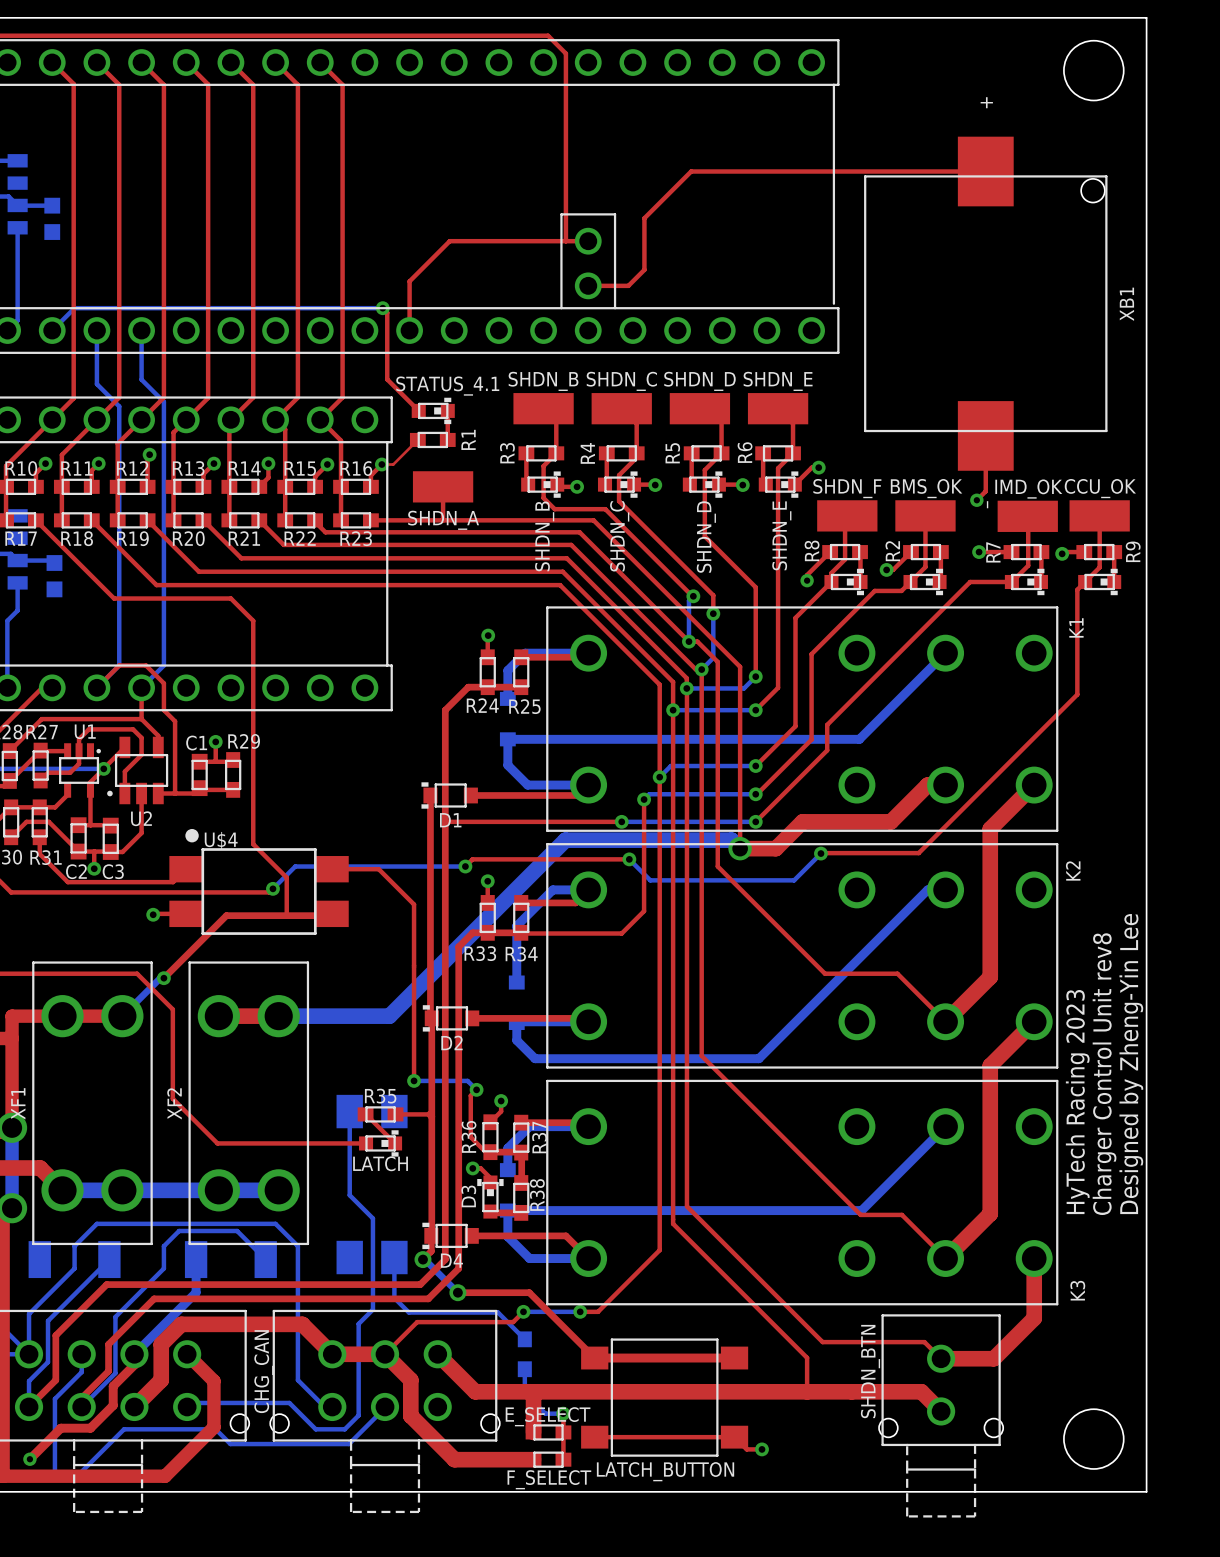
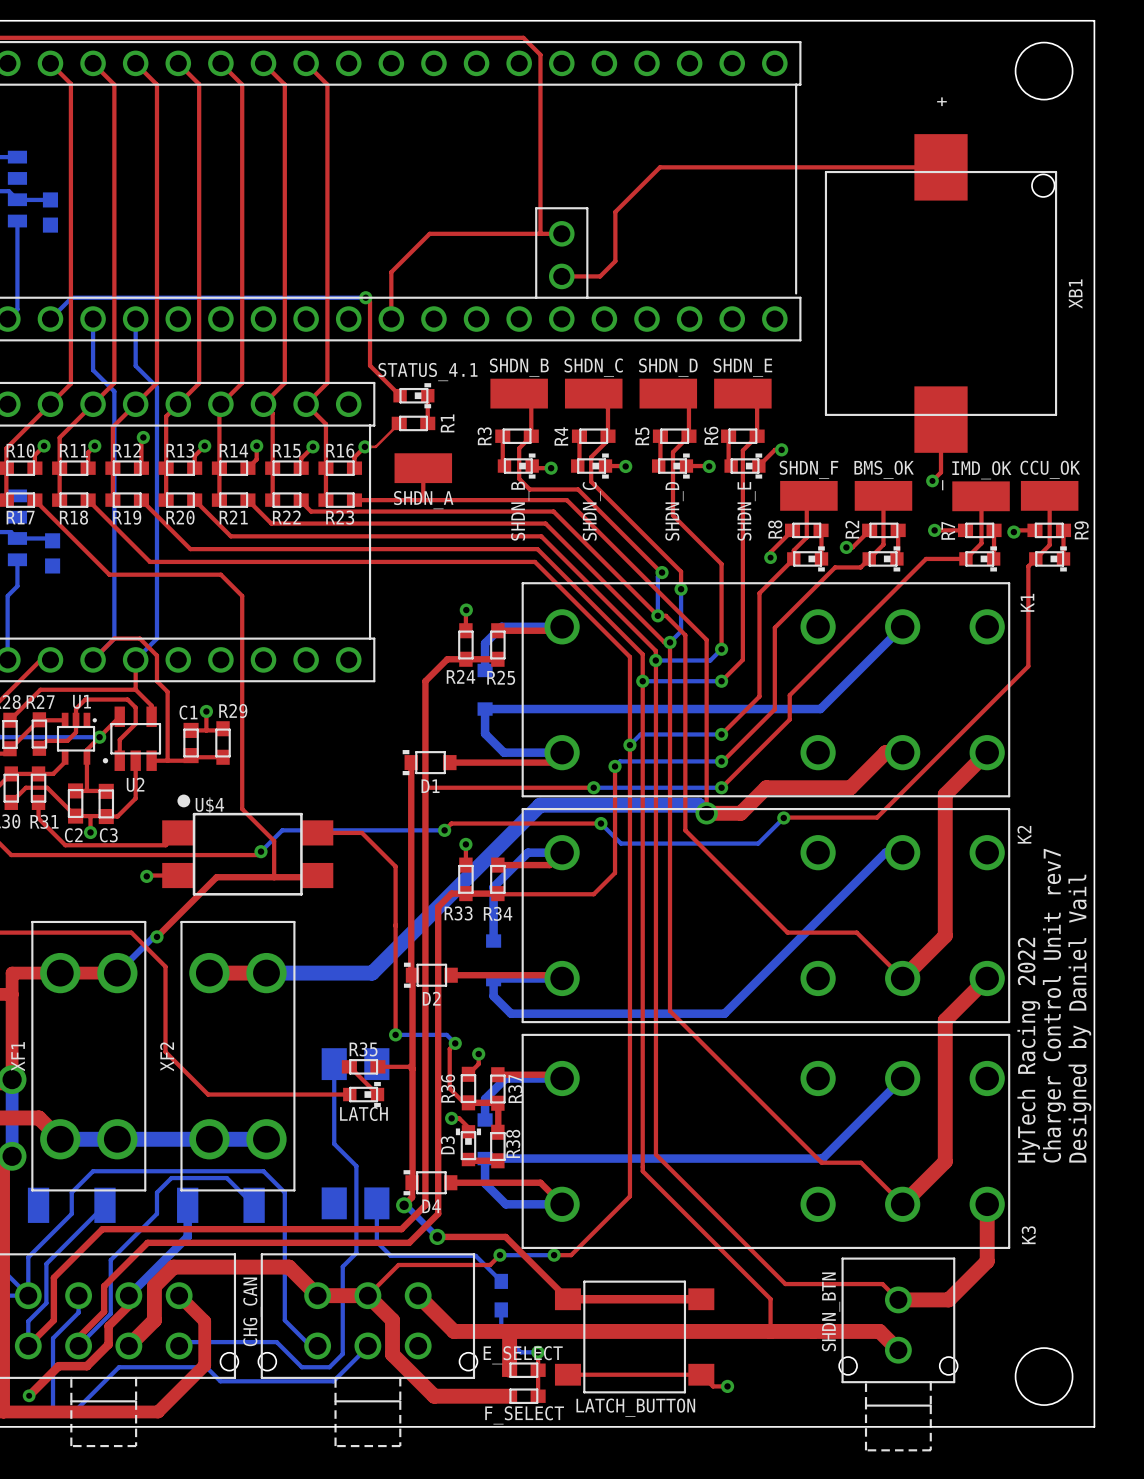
text: Designed by Zheng-Yin Lee (1131, 1064) -> Designed by Daniel Vail (1079, 1018)
text: Charger Control Unit rev8 (1104, 1074) -> Charger Control Unit rev7 (1054, 1005)
text: HyTech Racing 2023 (1077, 1102) -> HyTech Racing 2022 (1028, 1050)

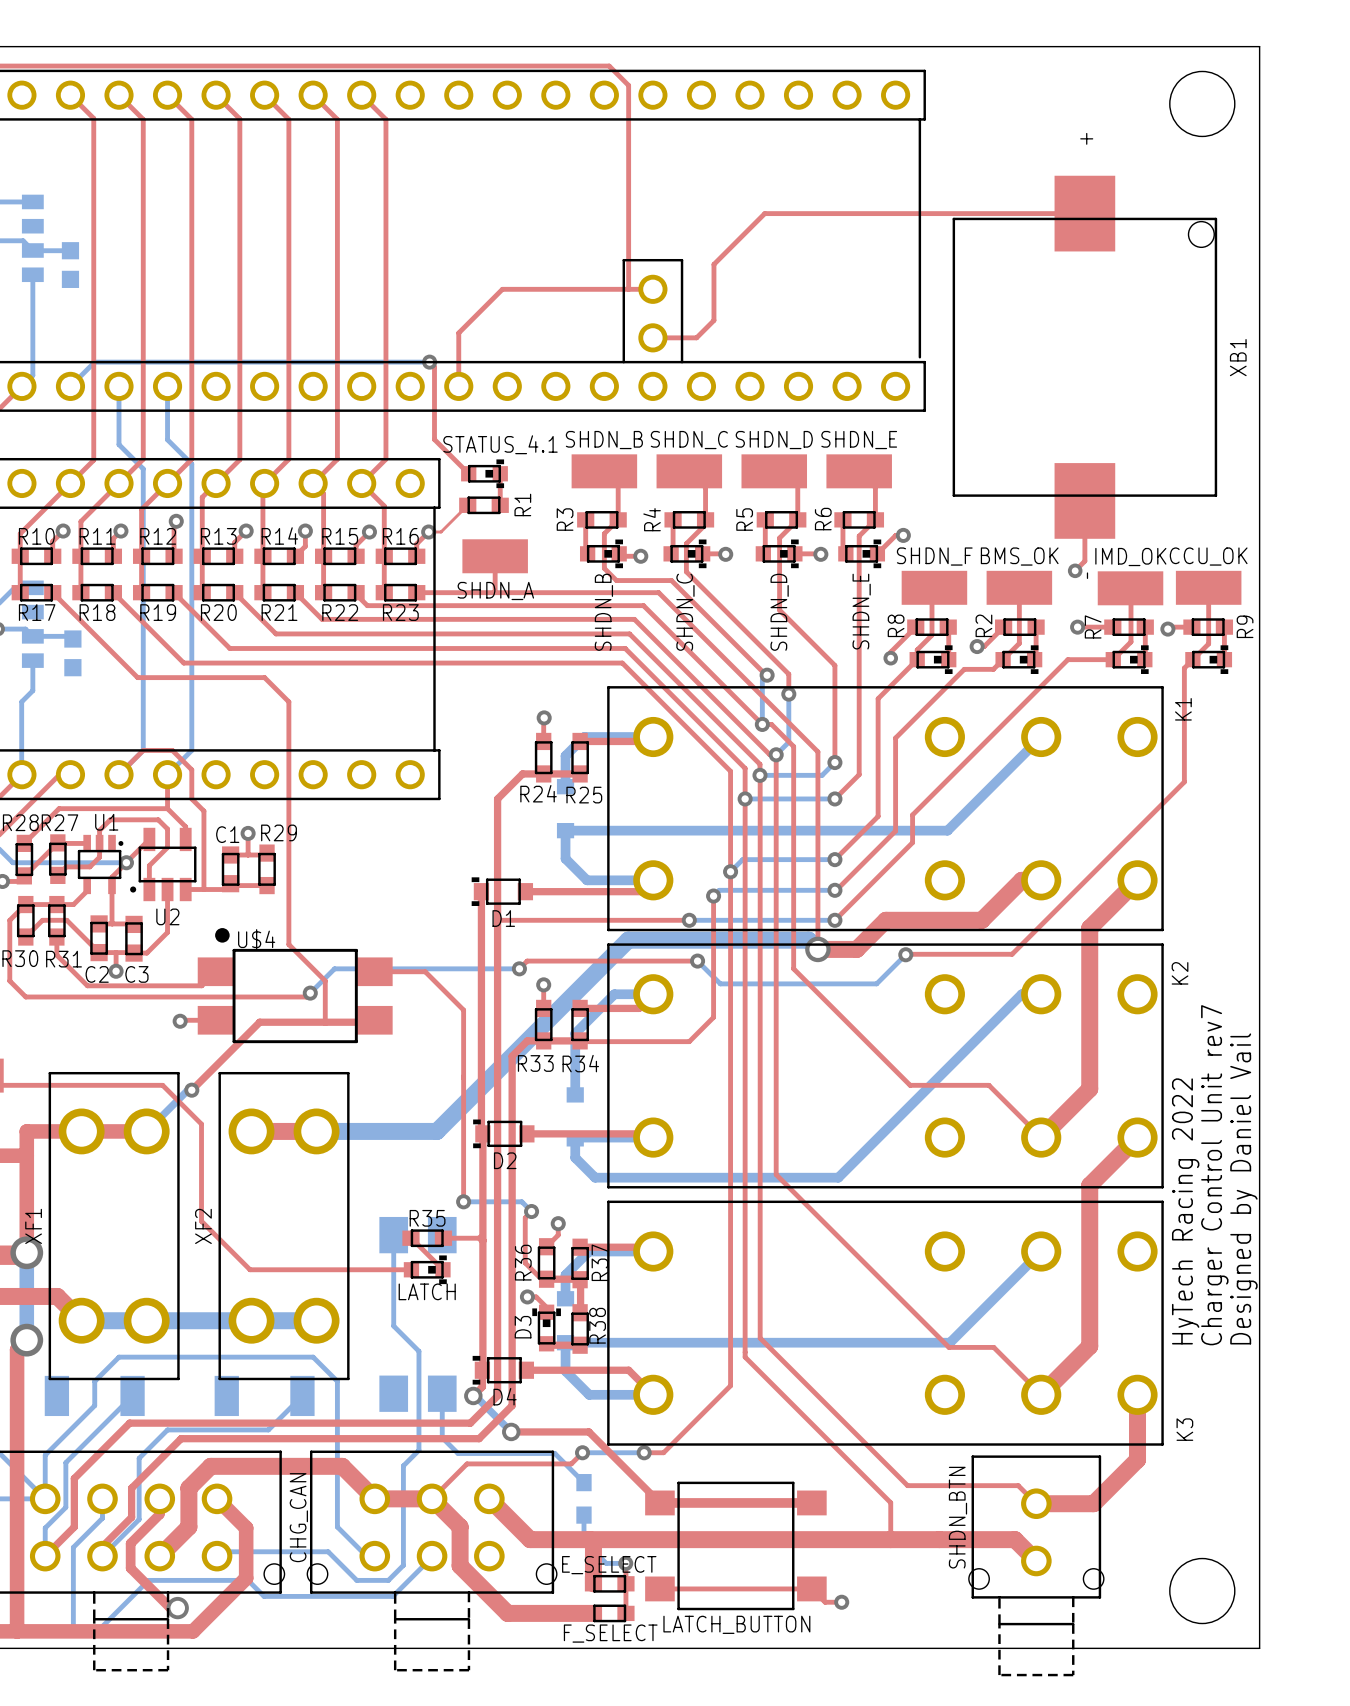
bottom track: (187, 1205) (187, 1236) (128, 1295) -> none
bottom track: (254, 1205) (226, 1178) (171, 1178) (156, 1192) (156, 1213) (135, 1235) -> (302, 1395) (268, 1429) (167, 1429)
top track: (128, 1305) (108, 1326) (108, 1344) (86, 1366) (58, 1366) (29, 1395) -> (159, 1510) (159, 1514) (130, 1543) (130, 1568) (170, 1608) (177, 1608)
via: none -> (177, 1608)
via: (29, 1395) -> none

